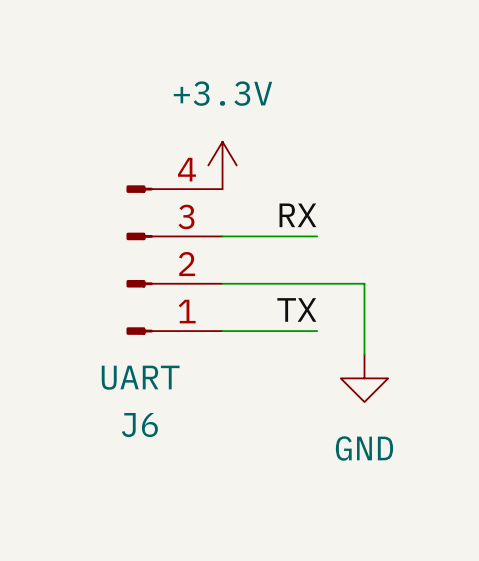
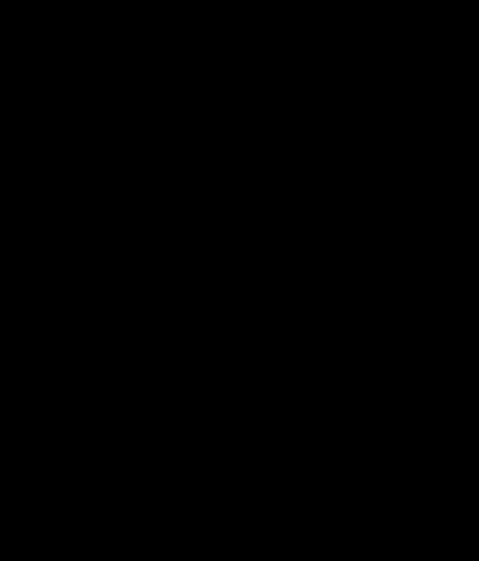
power symbol: +3.3V (222, 165) -> none
label: RX (297, 215) -> none
wire: (222, 236) (317, 236) -> none
J6: UART (174, 260) -> none
wire: (222, 283) (364, 283) (364, 354) -> none
label: TX (296, 309) -> none
wire: (222, 331) (317, 331) -> none
power symbol: GND (364, 378) -> none

